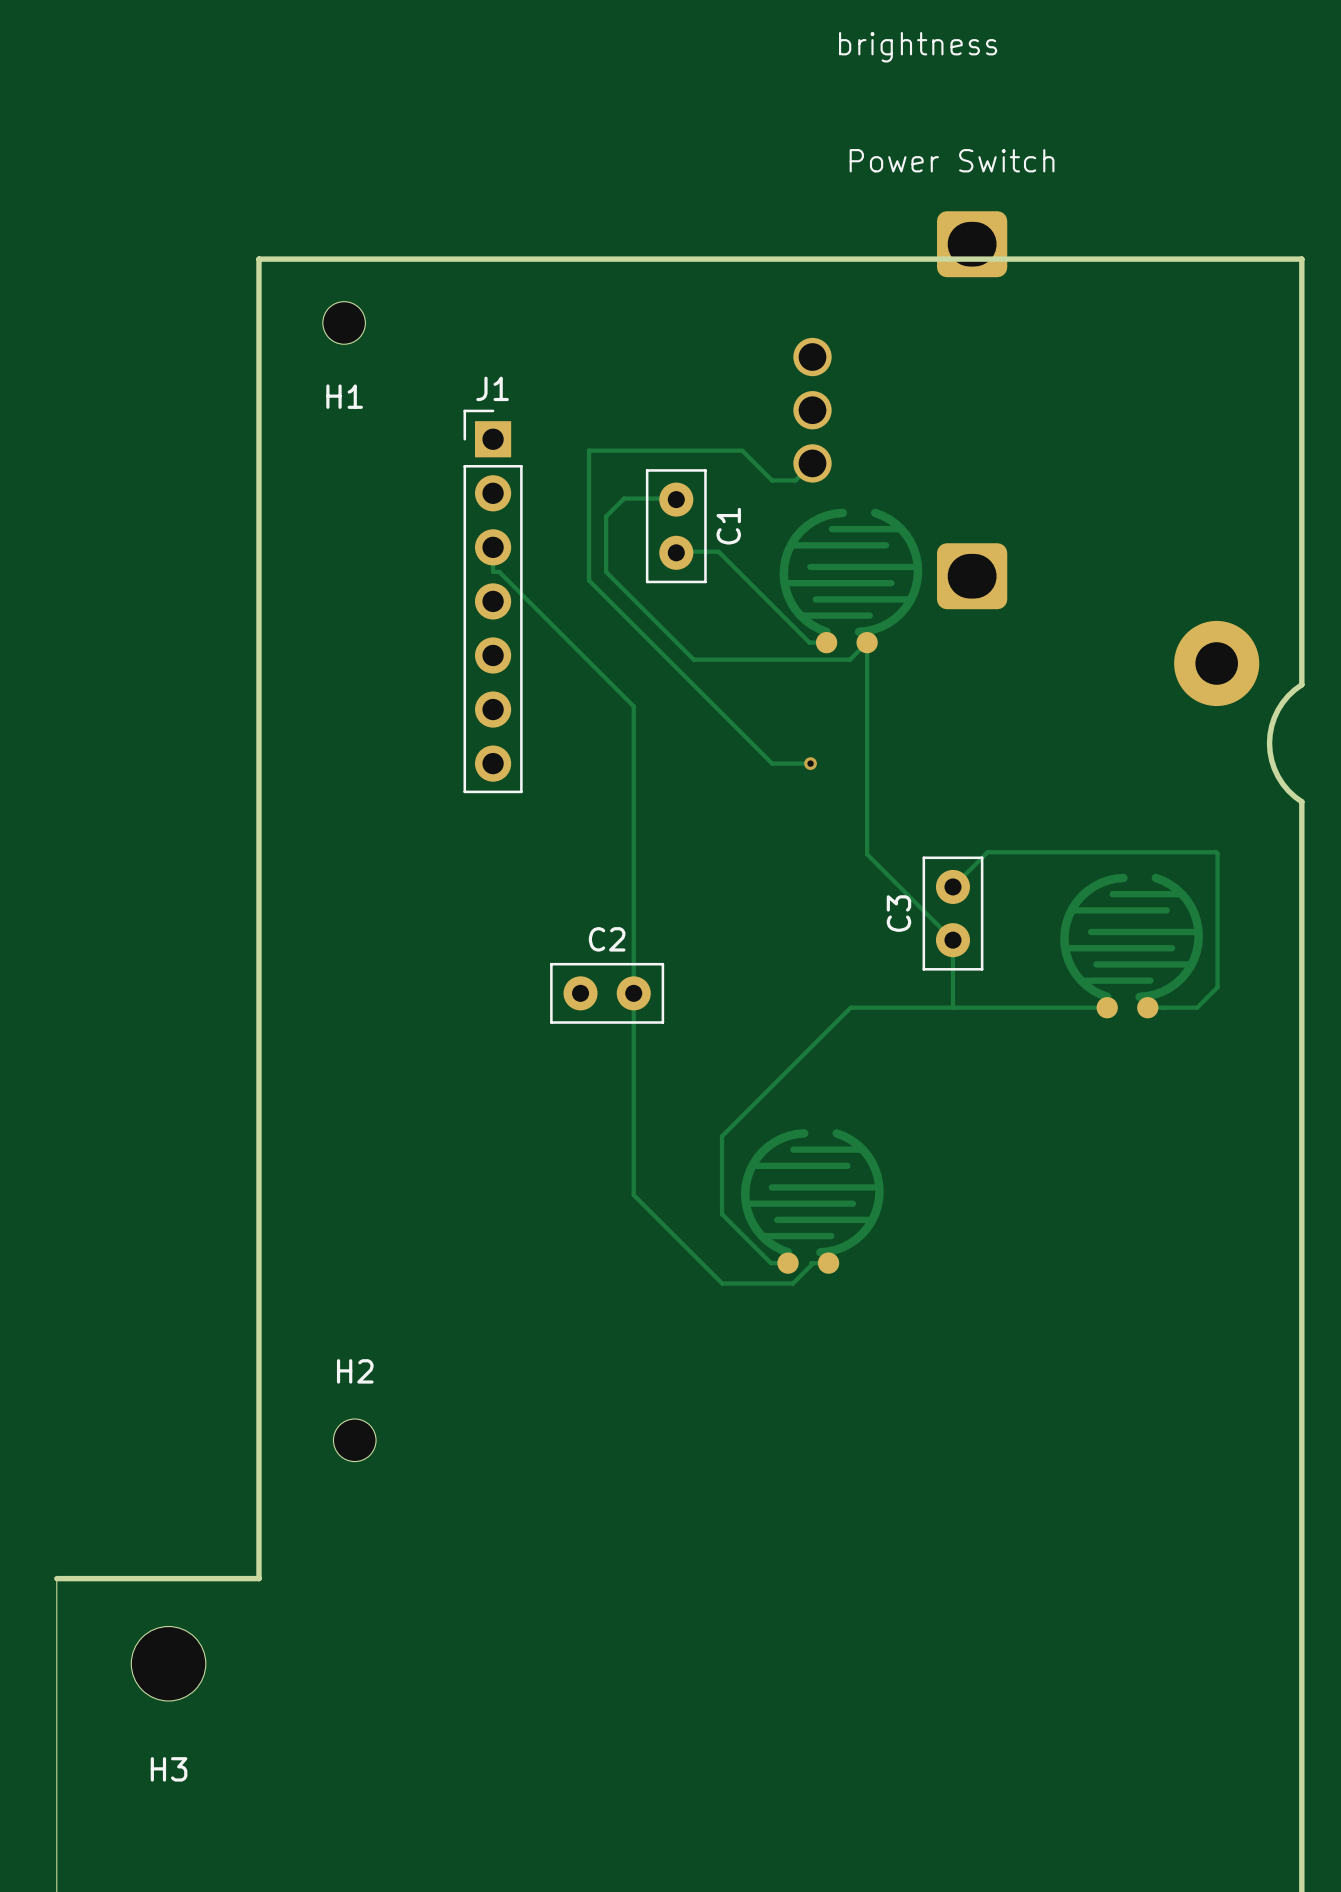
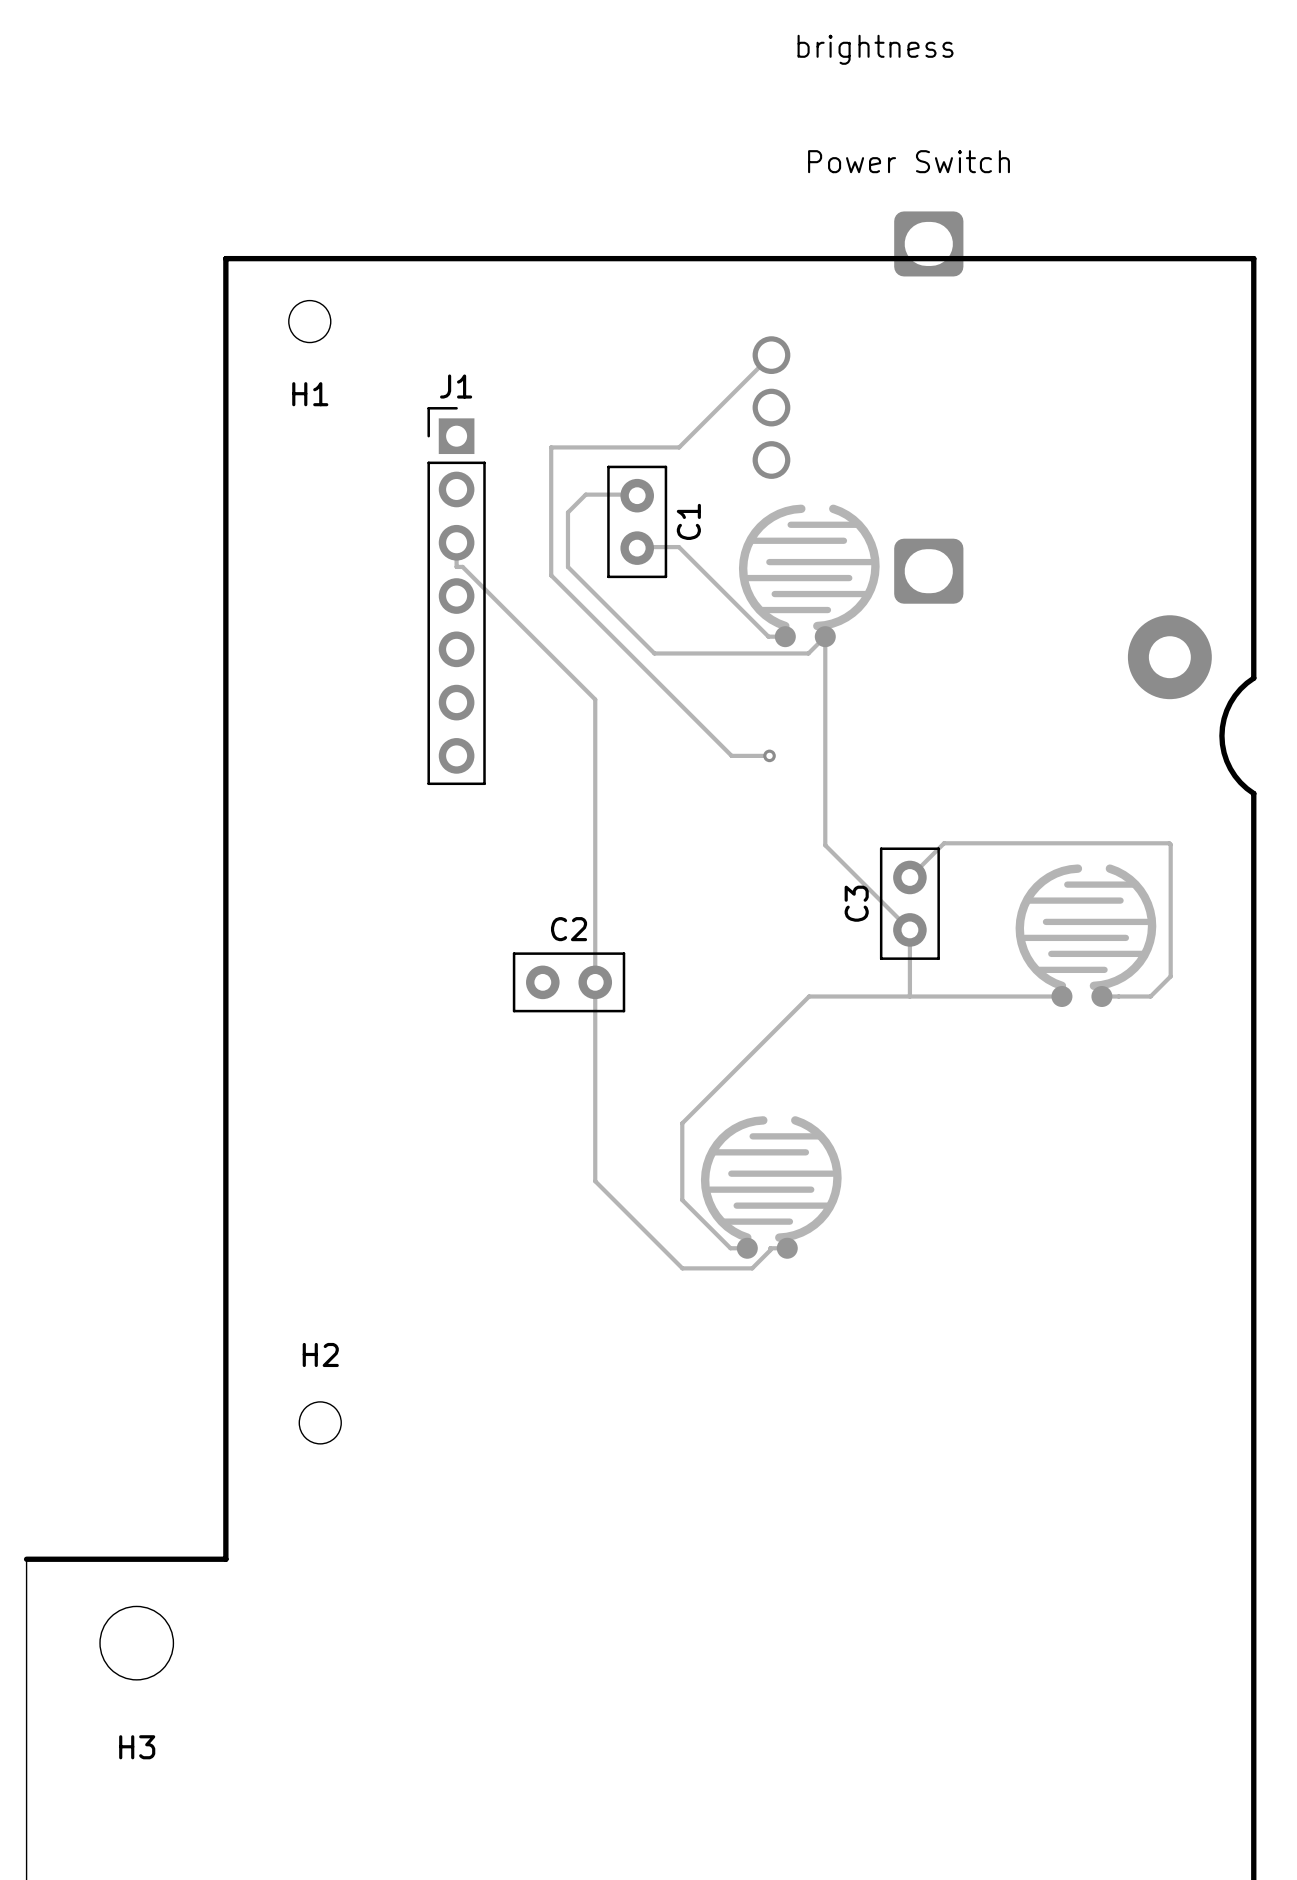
track: (718, 450) (742, 450) (772, 480) (795, 480) (812, 463) -> (679, 447) (771, 355)

